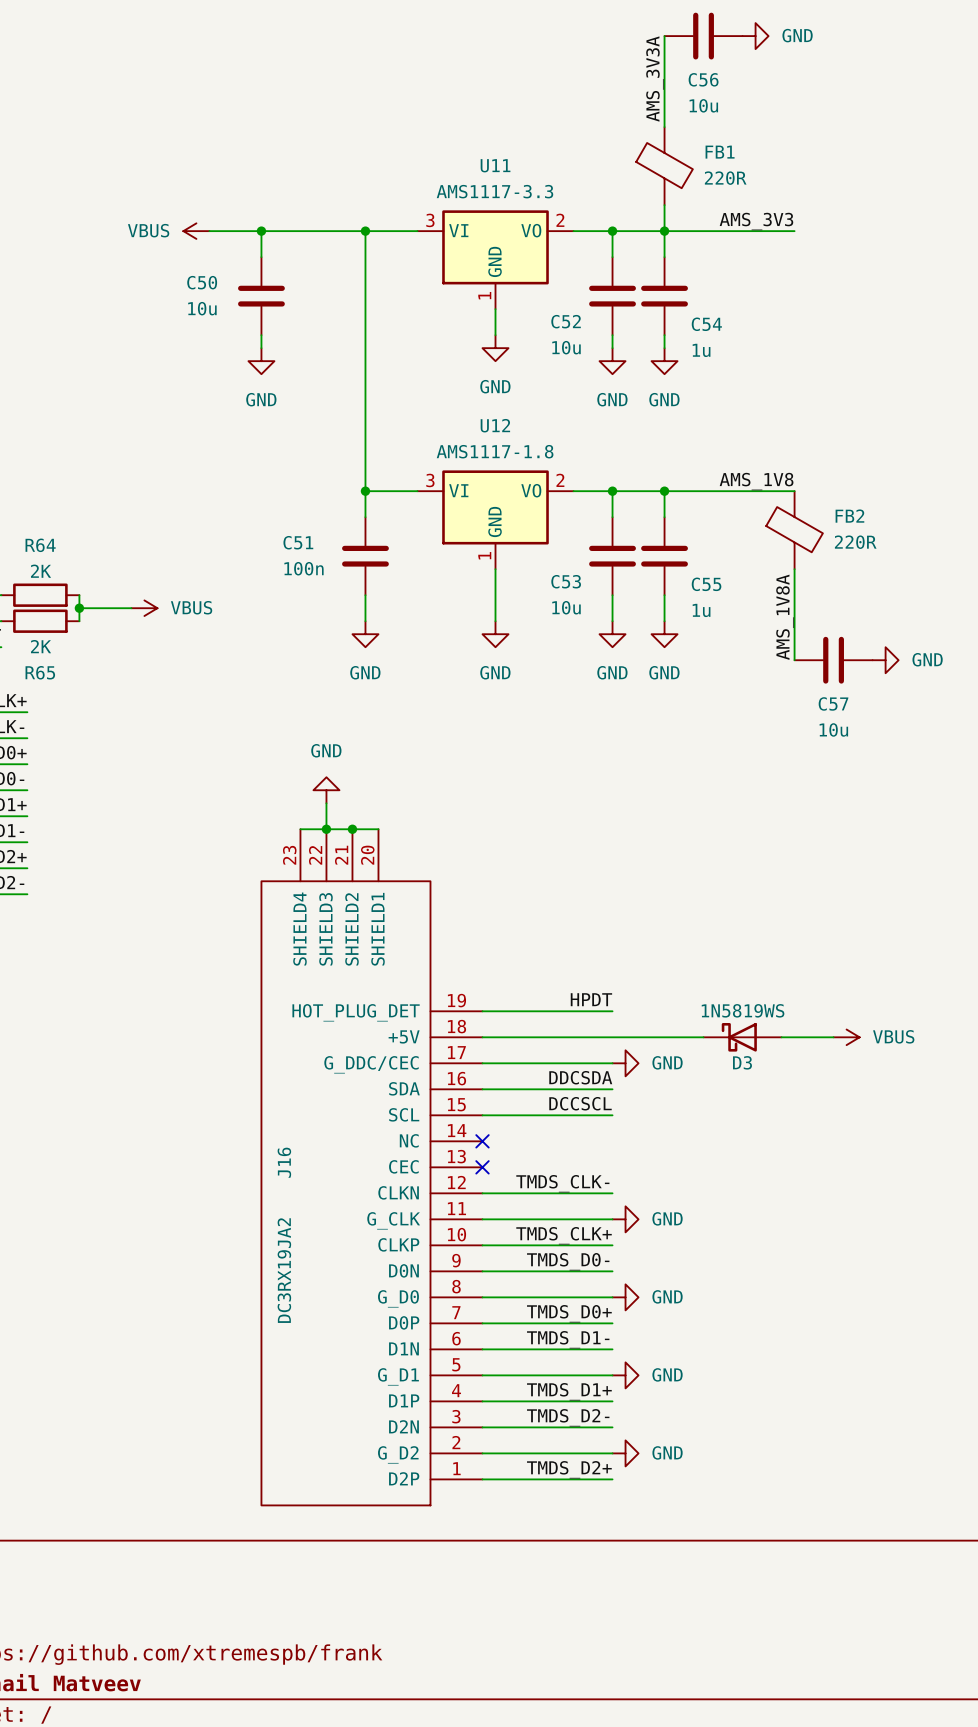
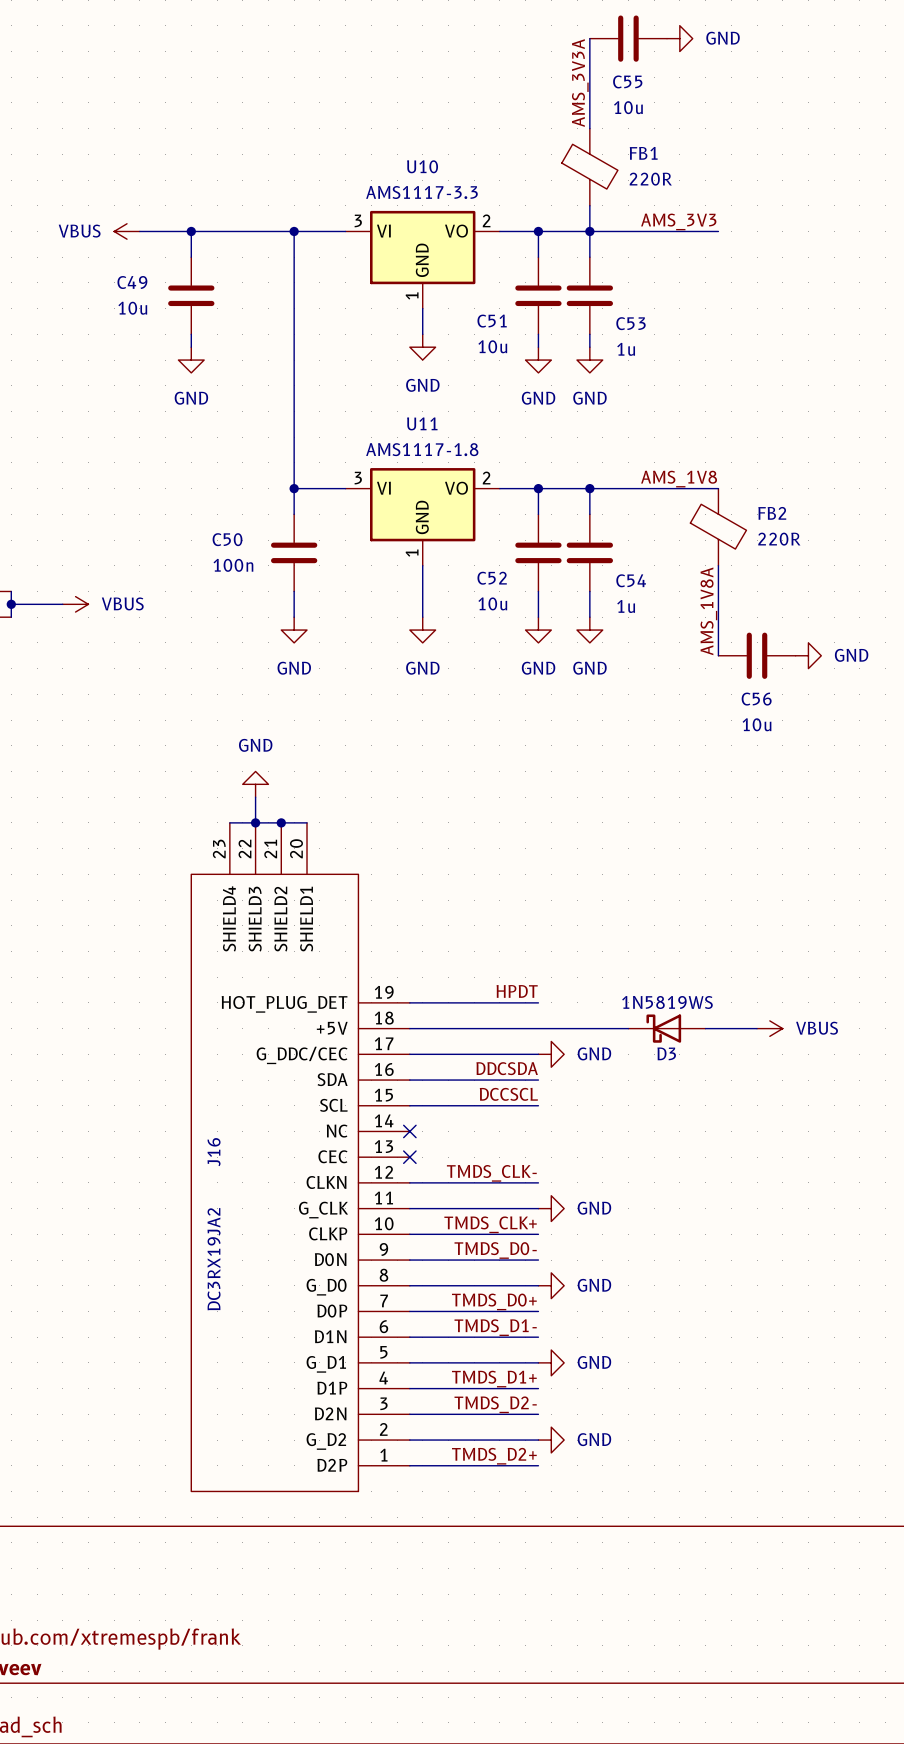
C56 name: C56 (703, 79) -> C55 (627, 81)
U11 name: U11 (495, 165) -> U10 (422, 166)
C50 name: C50 (202, 282) -> C49 (132, 282)
C52 name: C52 (566, 321) -> C51 (492, 321)
C54 name: C54 (706, 324) -> C53 (630, 323)
U12 name: U12 (495, 425) -> U11 (422, 423)
C51 name: C51 (298, 542) -> C50 (227, 539)
C53 name: C53 (566, 581) -> C52 (492, 578)
C55 name: C55 (706, 584) -> C54 (631, 580)
C57 name: C57 (833, 703) -> C56 (756, 699)

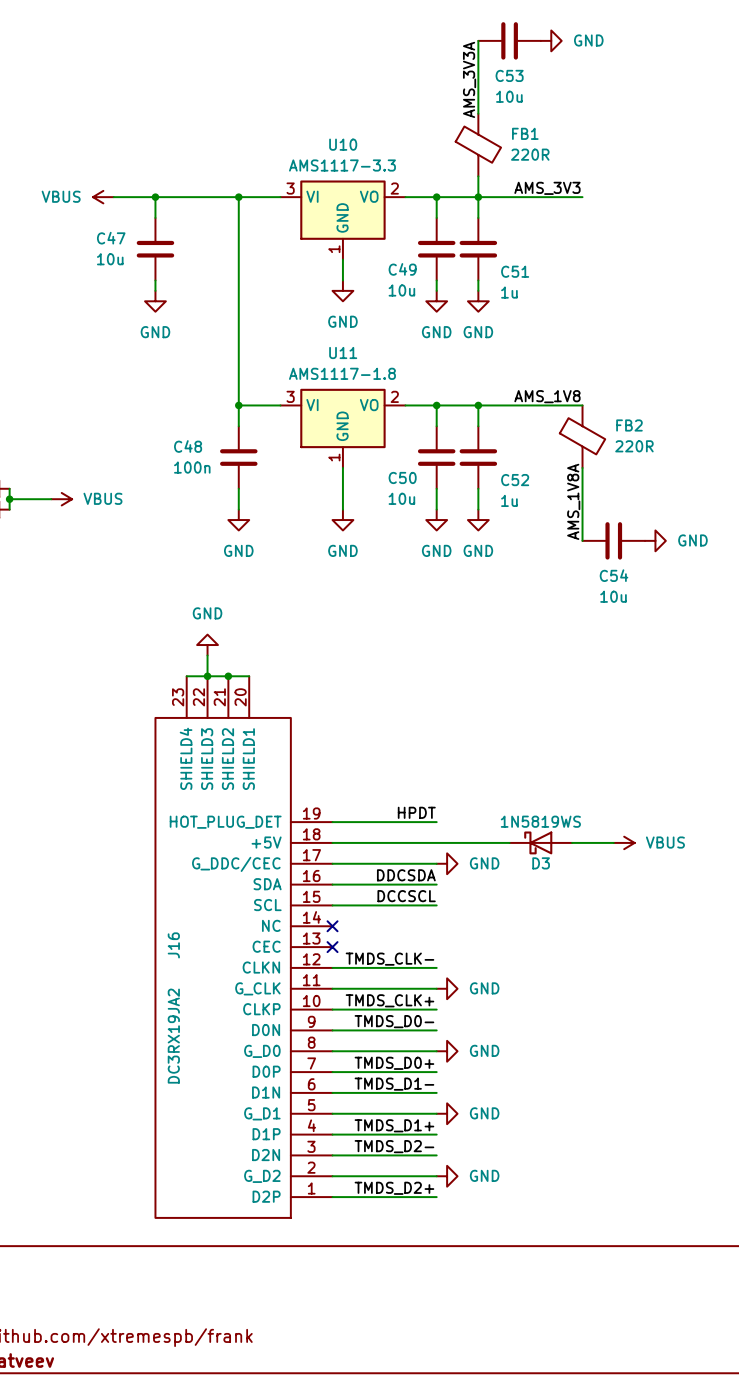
C55 name: C55 (627, 81) -> C53 (509, 75)
C49 name: C49 (132, 282) -> C47 (111, 238)
C51 name: C51 (492, 321) -> C49 (402, 269)
C53 name: C53 (630, 323) -> C51 (515, 271)
C50 name: C50 (227, 539) -> C48 (188, 446)
C52 name: C52 (492, 578) -> C50 (402, 477)
C54 name: C54 (631, 580) -> C52 (515, 480)
C56 name: C56 (756, 699) -> C54 (614, 575)

